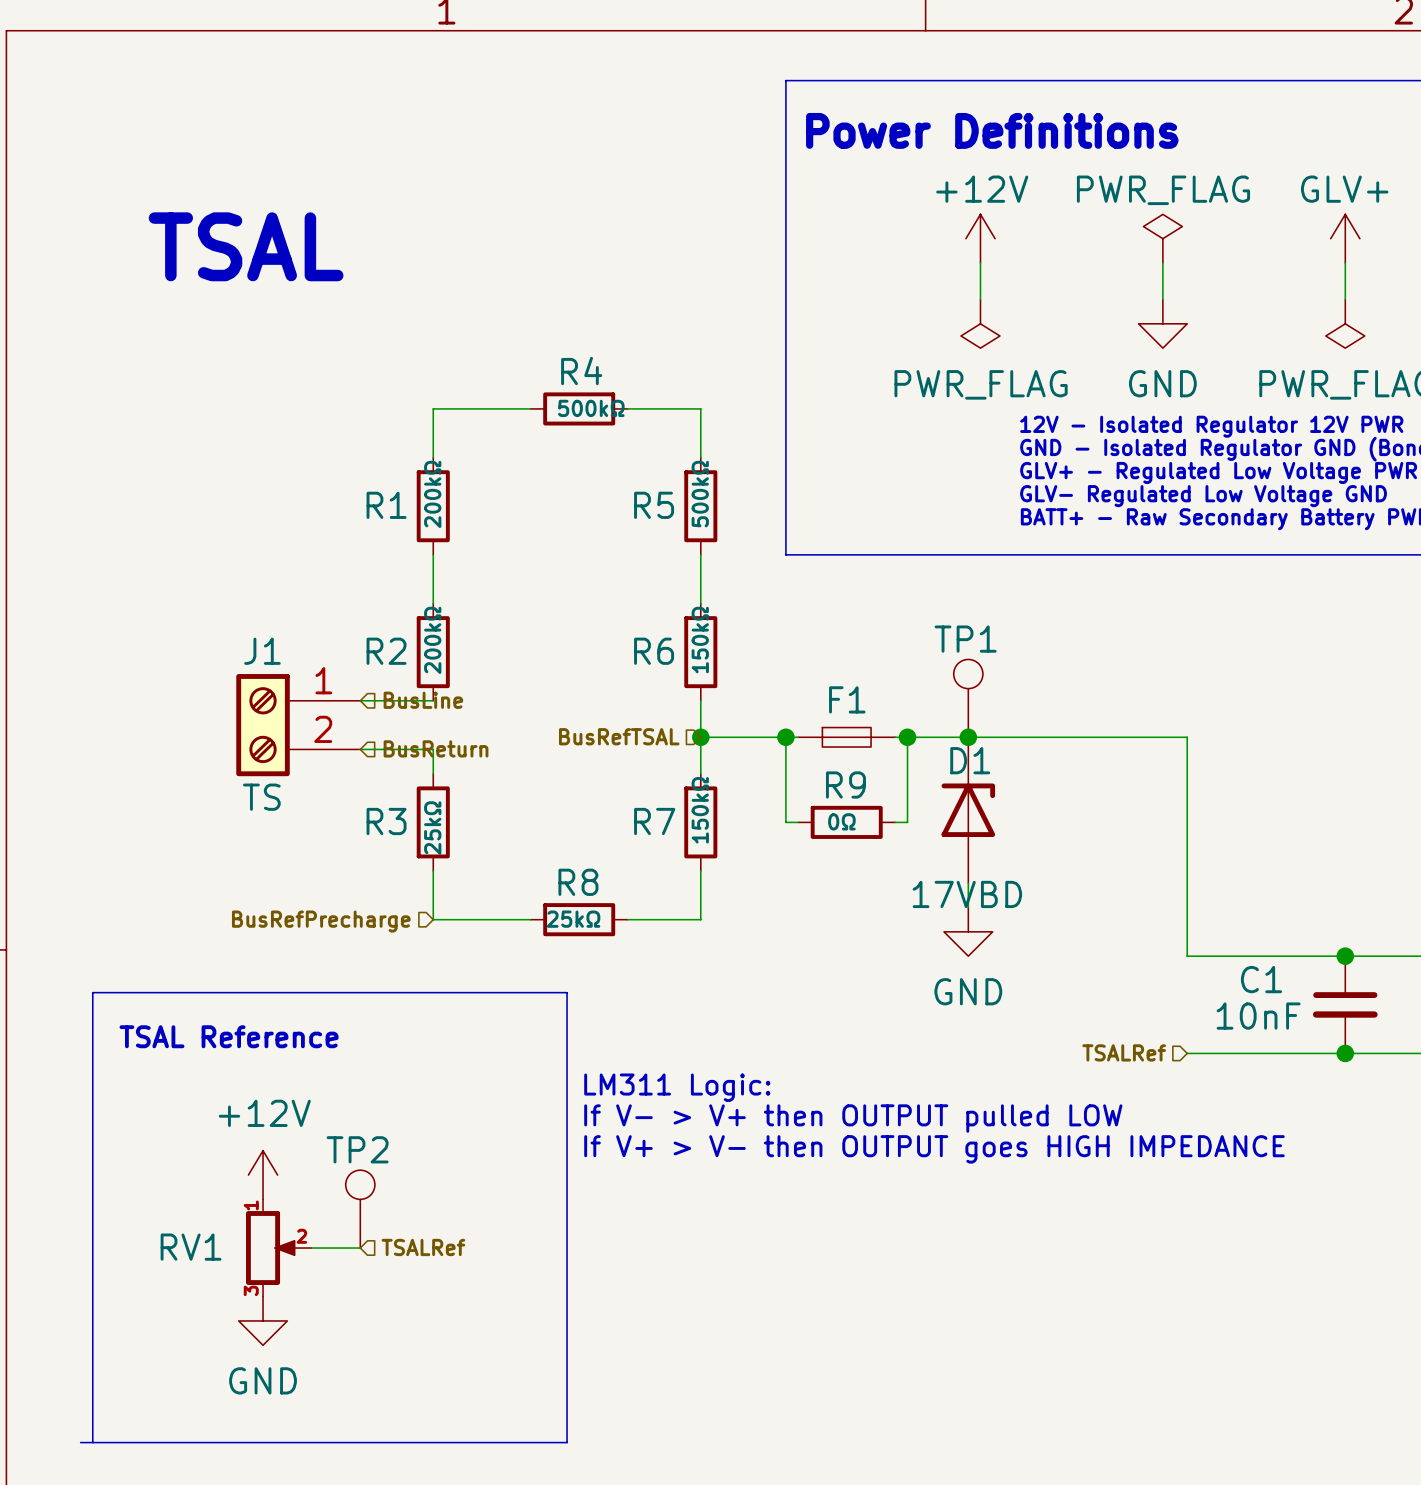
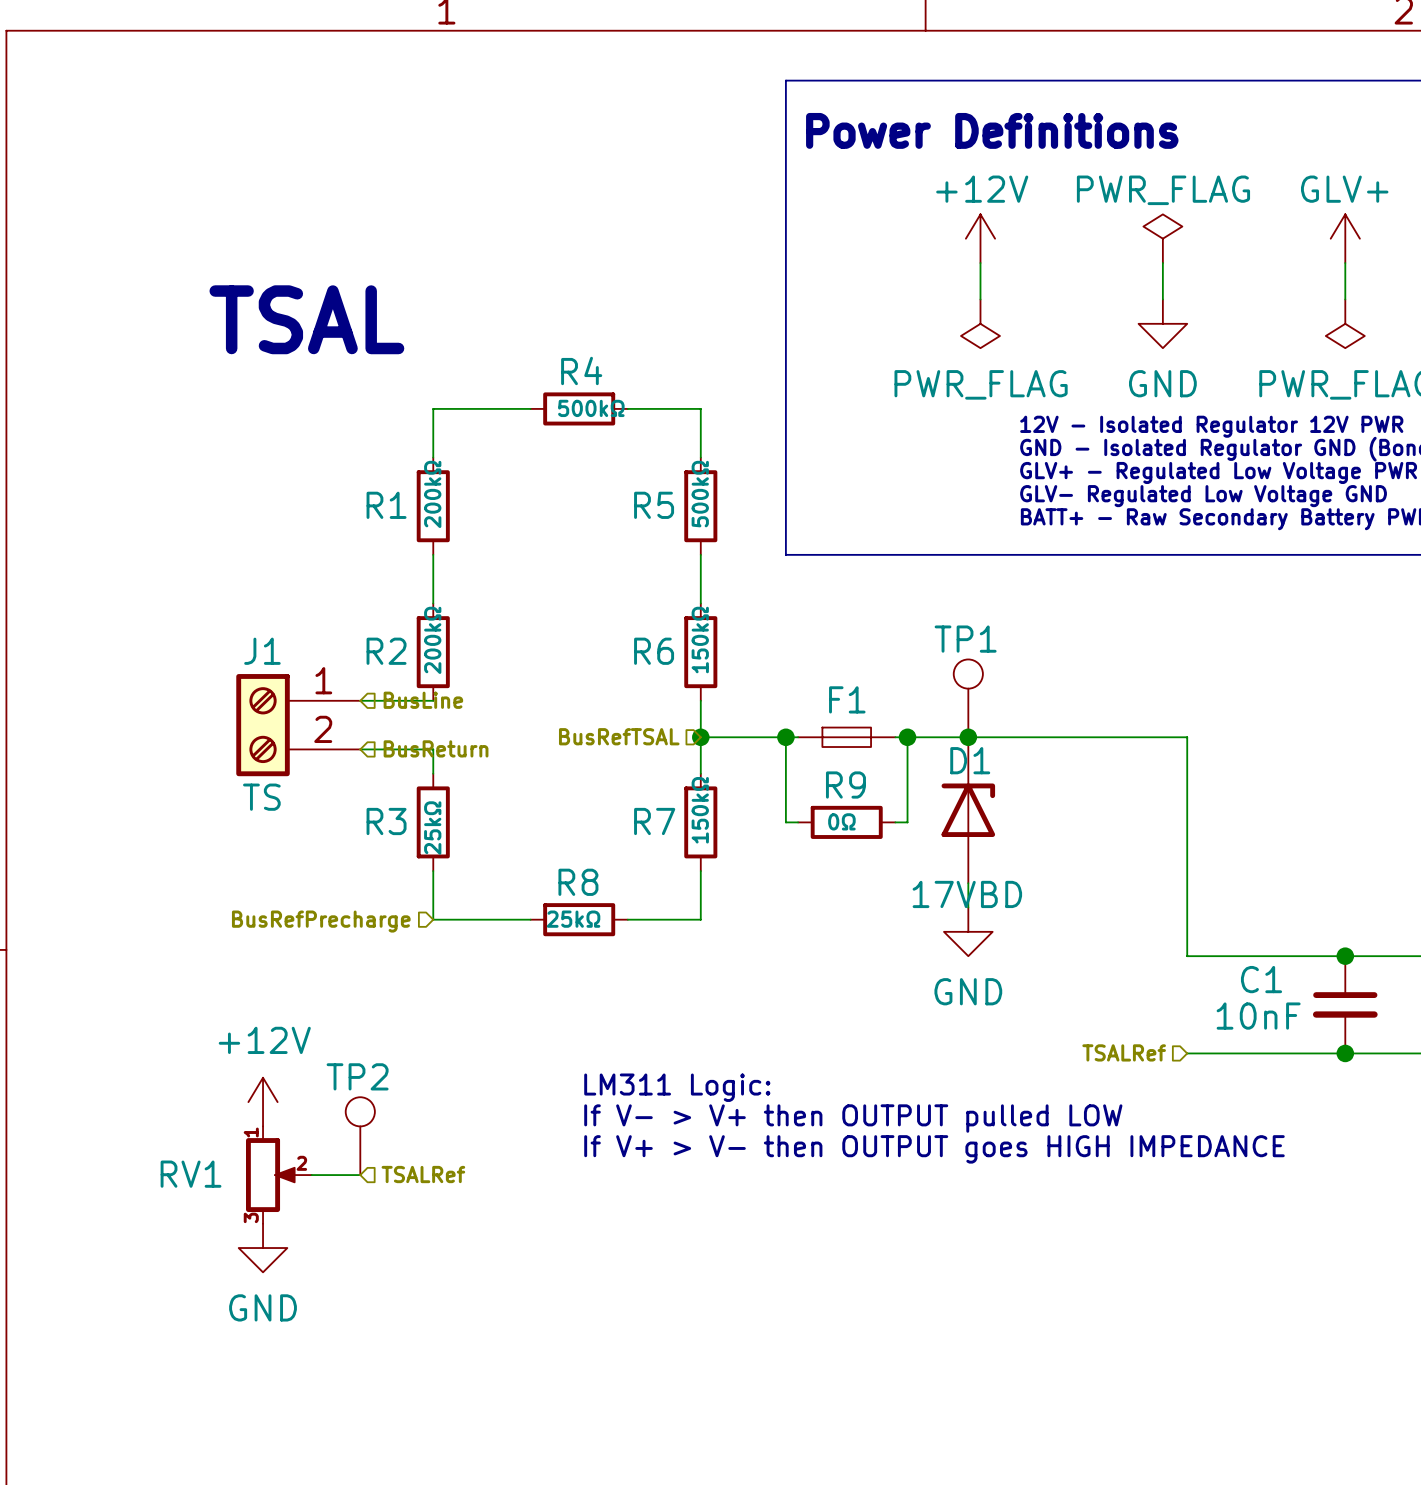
text position: TSAL (246, 246) -> TSAL (306, 319)
text: TSAL Reference (229, 1036) -> none
power symbol position: +12V (263, 1175) -> +12V (263, 1102)
TP2 position: (360, 1209) -> (360, 1136)
hierarchical label position: TSALRef (423, 1247) -> TSALRef (423, 1174)
RV1 position: (278, 1248) -> (278, 1175)
wire: (311, 1248) (360, 1248) -> (311, 1175) (360, 1175)
power symbol position: GND (263, 1320) -> GND (263, 1248)
line: (80, 1442) (567, 1442) (567, 992) (92, 992) (92, 1442) -> none

